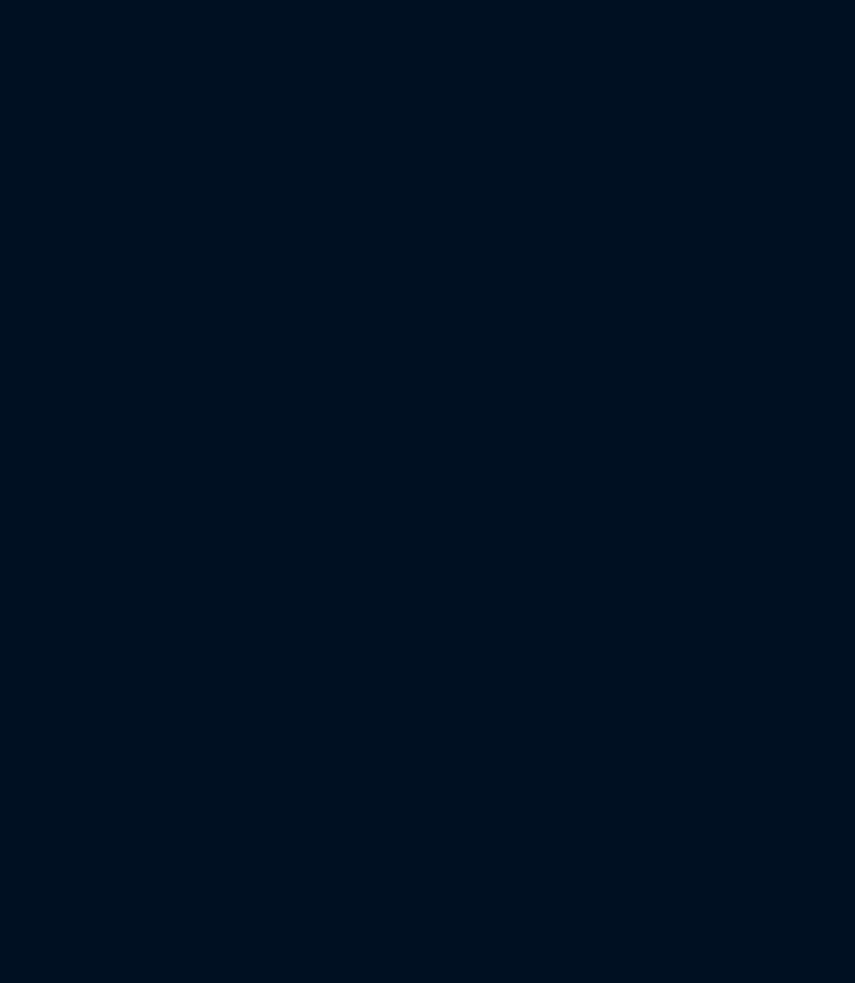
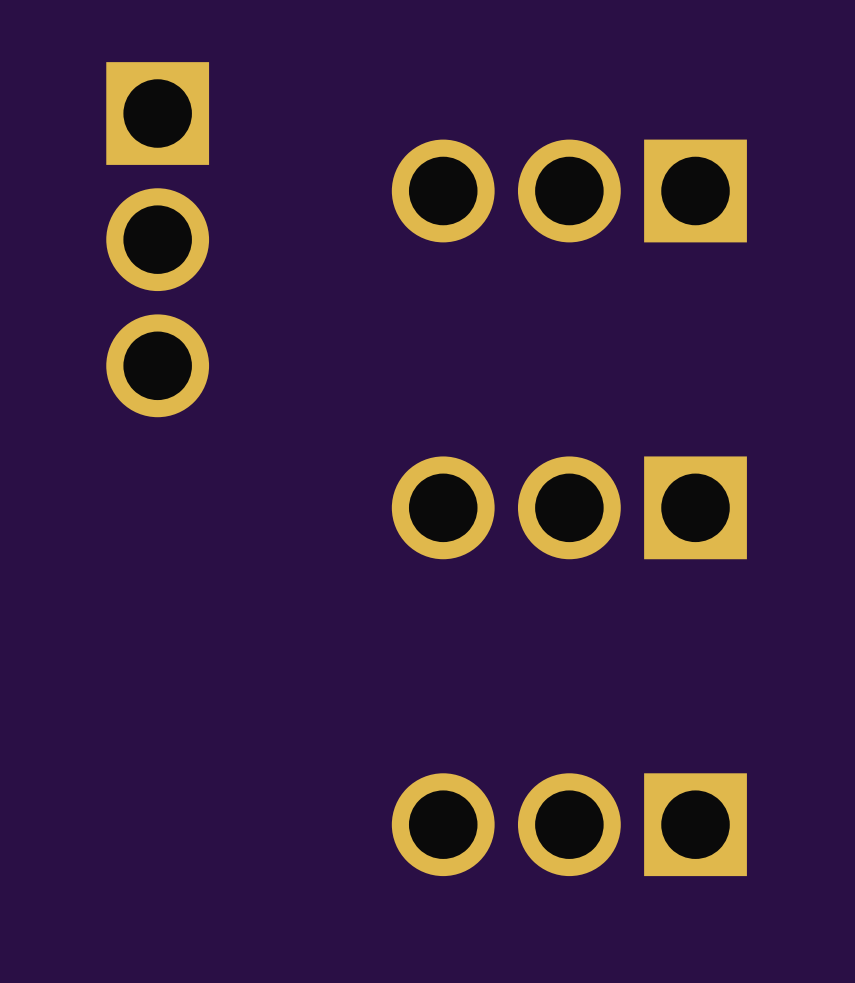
part: none -> (569, 190)
part: none -> (157, 239)
part: none -> (569, 507)
part: none -> (569, 824)

